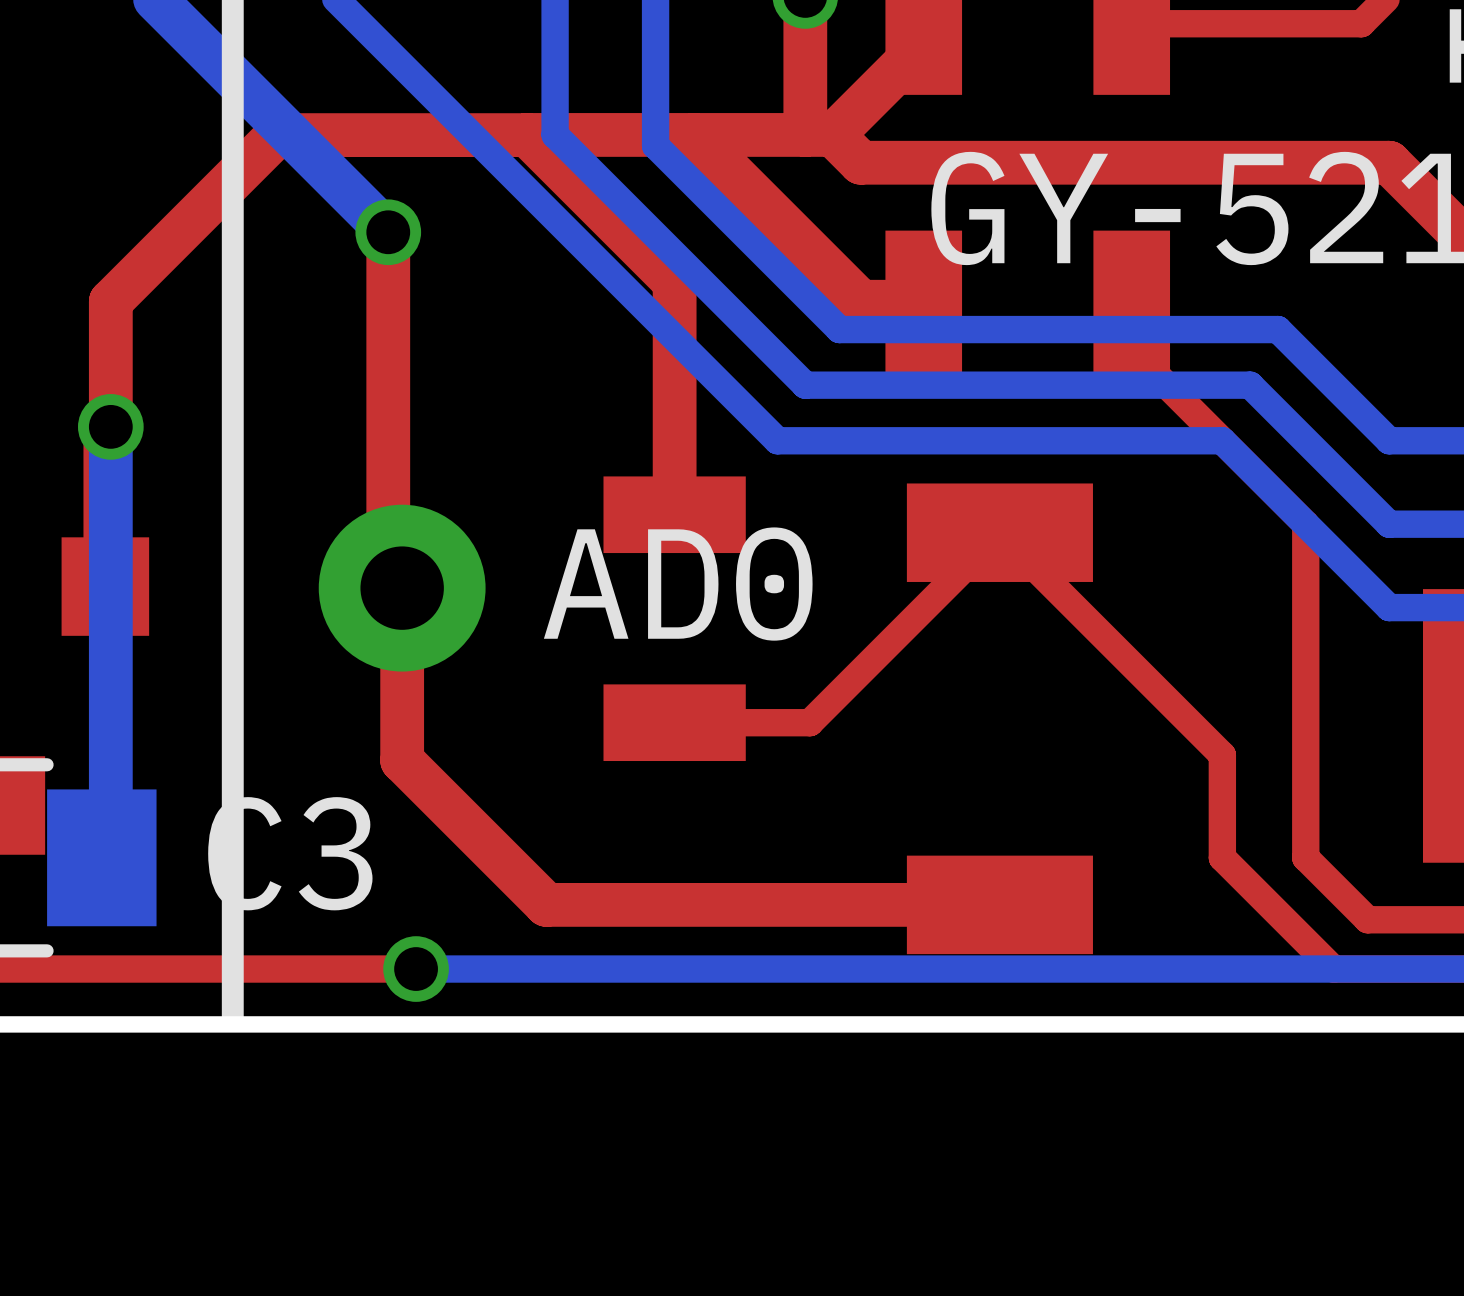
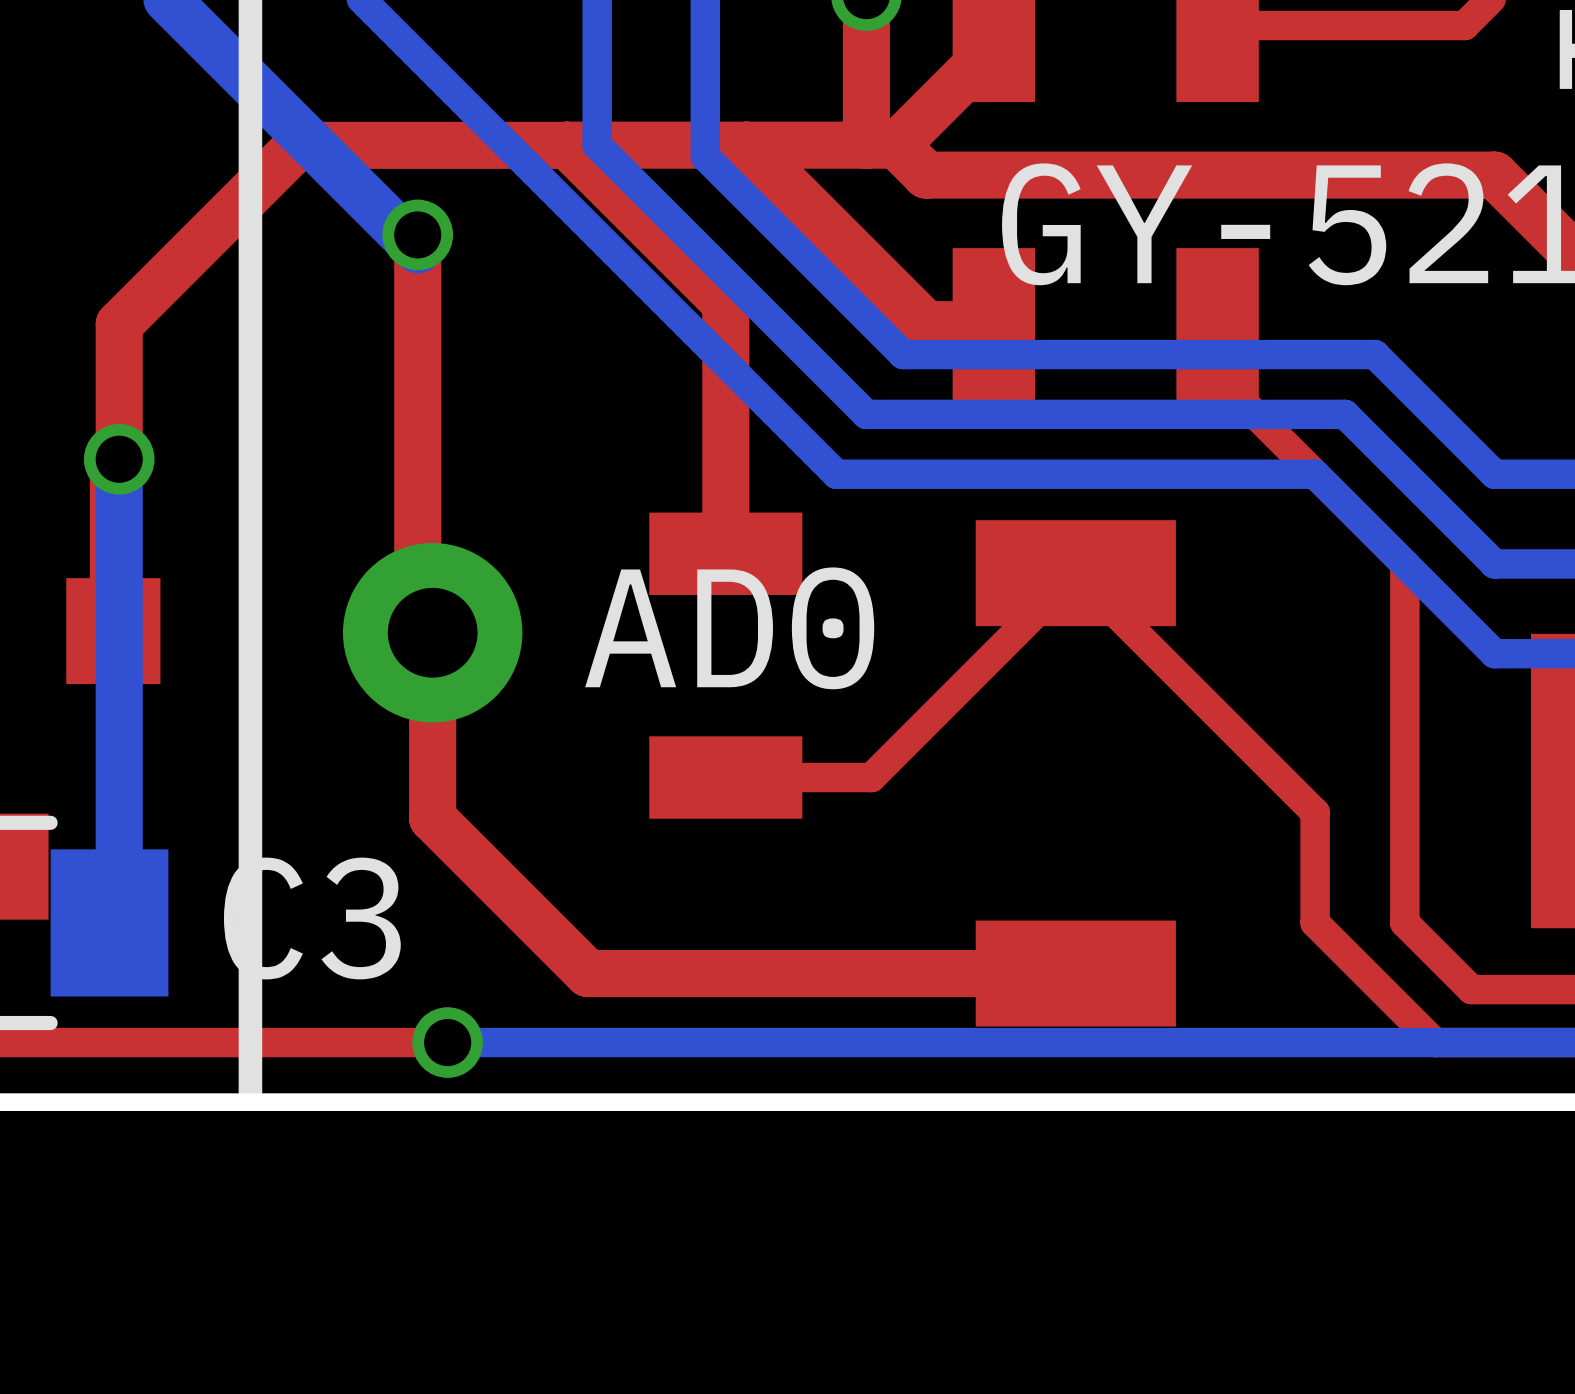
via position: (388, 232) -> (417, 234)

